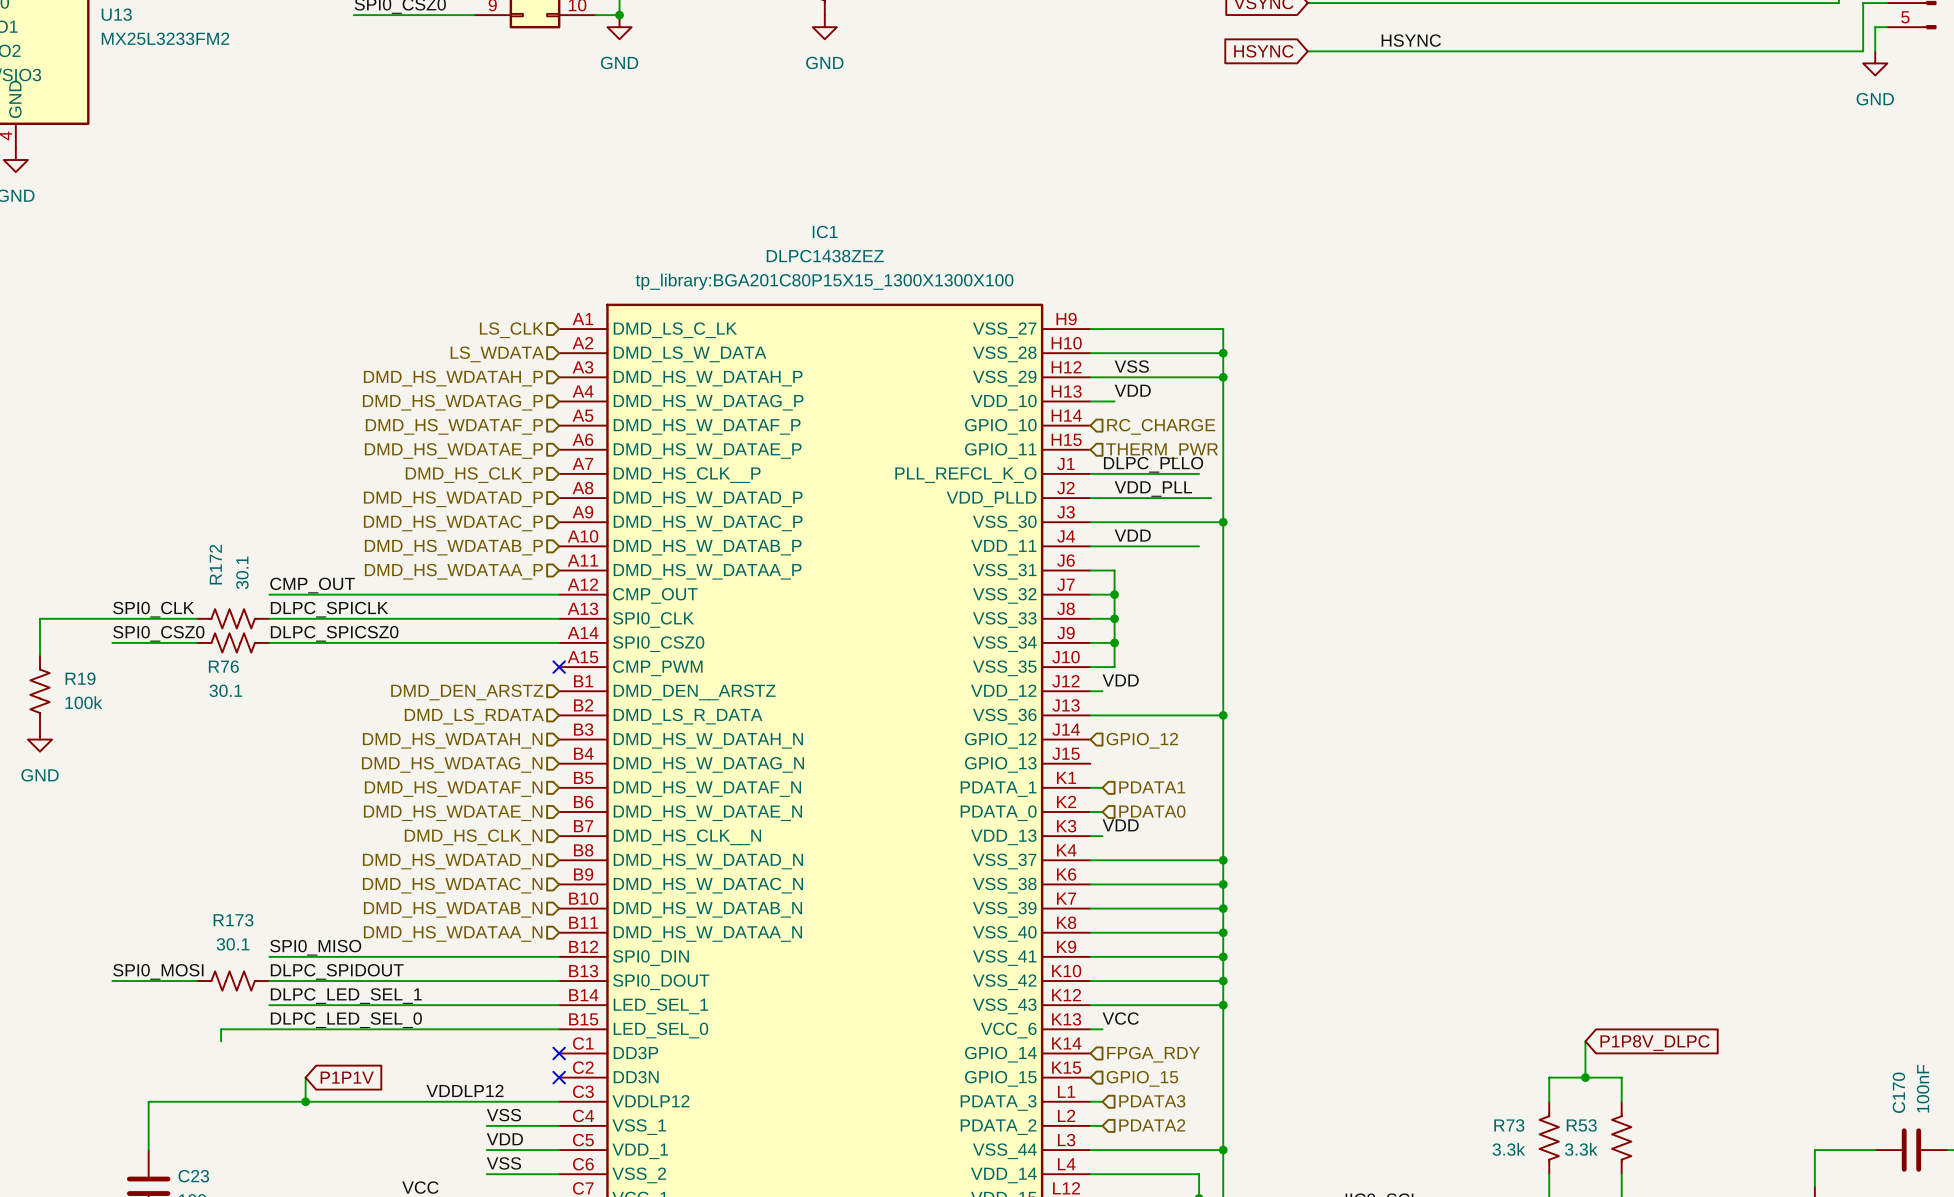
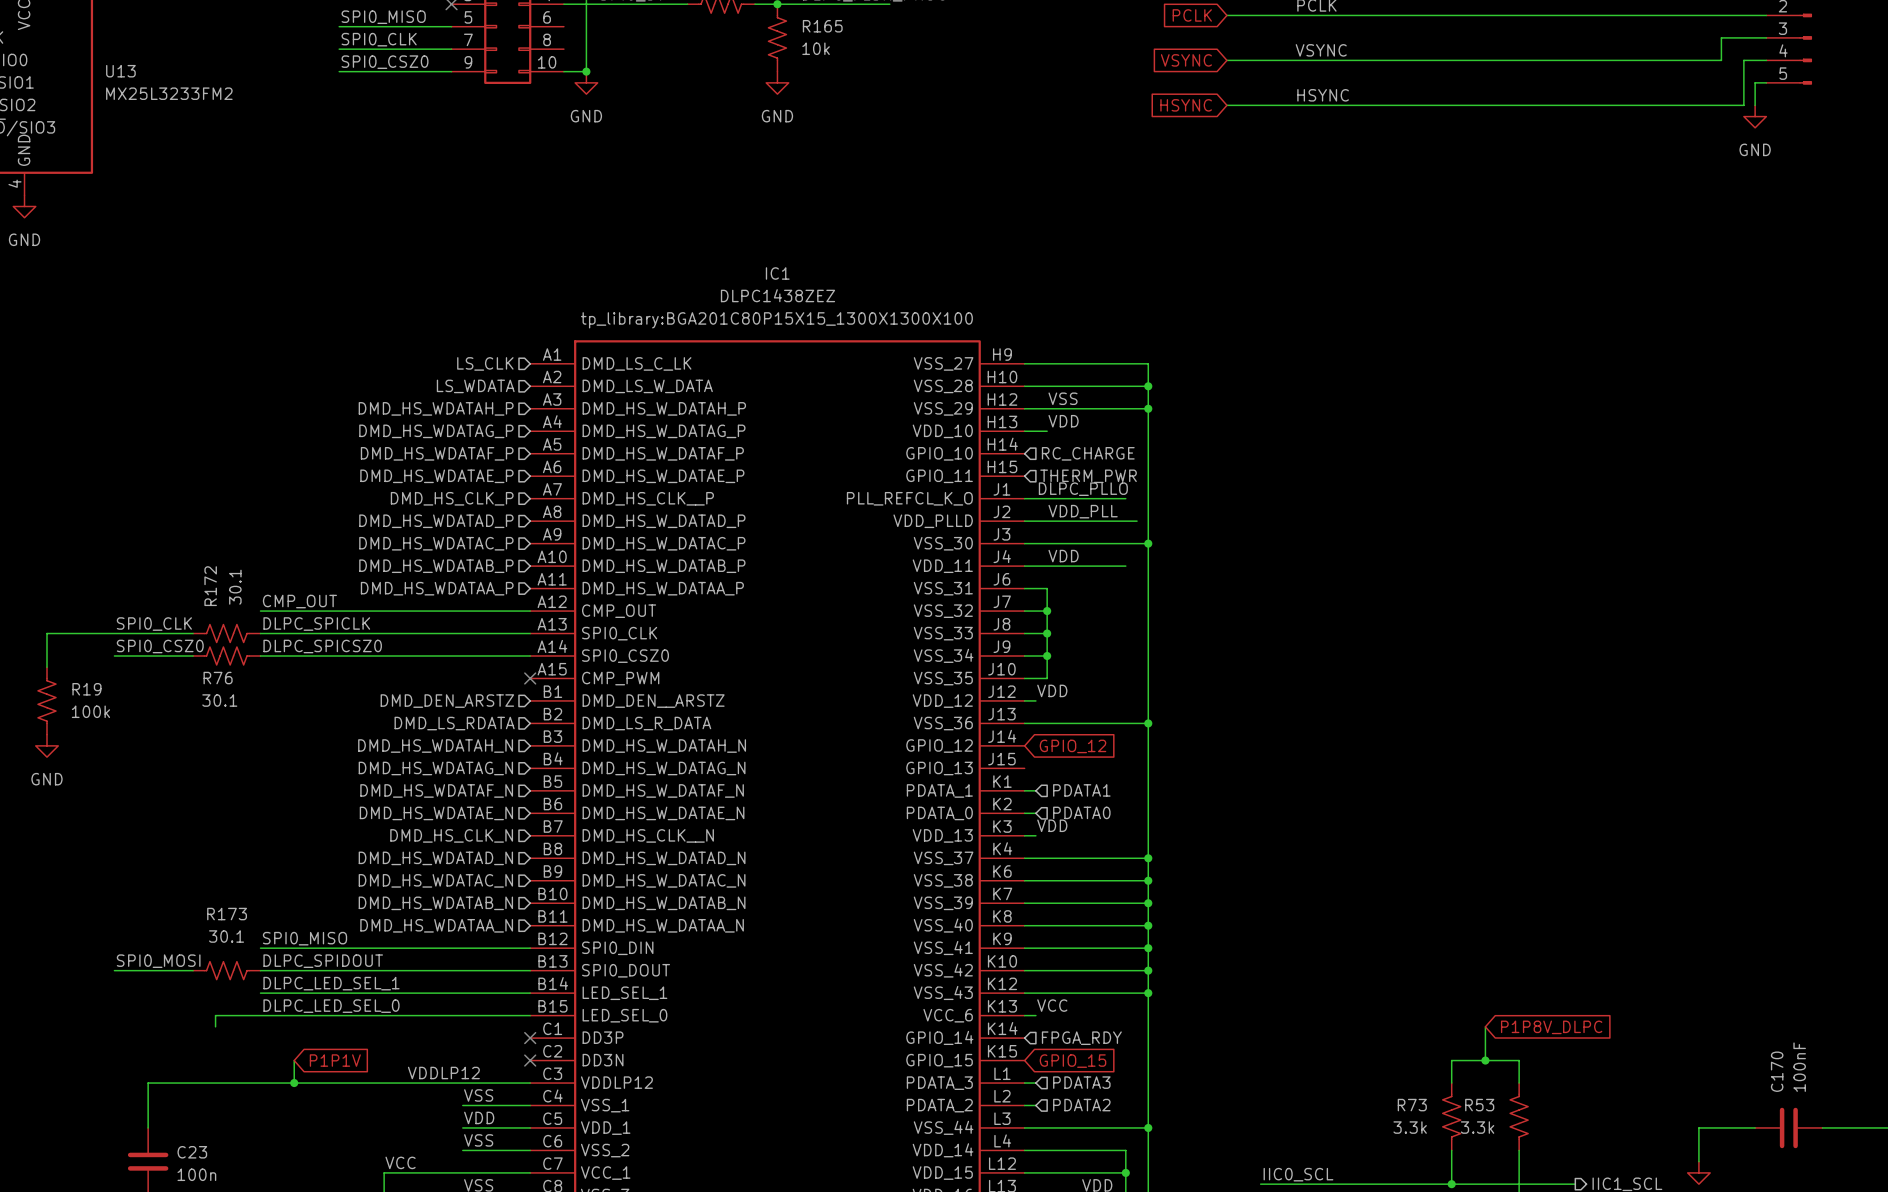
hierarchical label: GPIO_12 (1142, 740) -> none
global label: none -> GPIO_12 (1072, 746)
hierarchical label: GPIO_15 (1142, 1078) -> none
global label: none -> GPIO_15 (1072, 1061)

